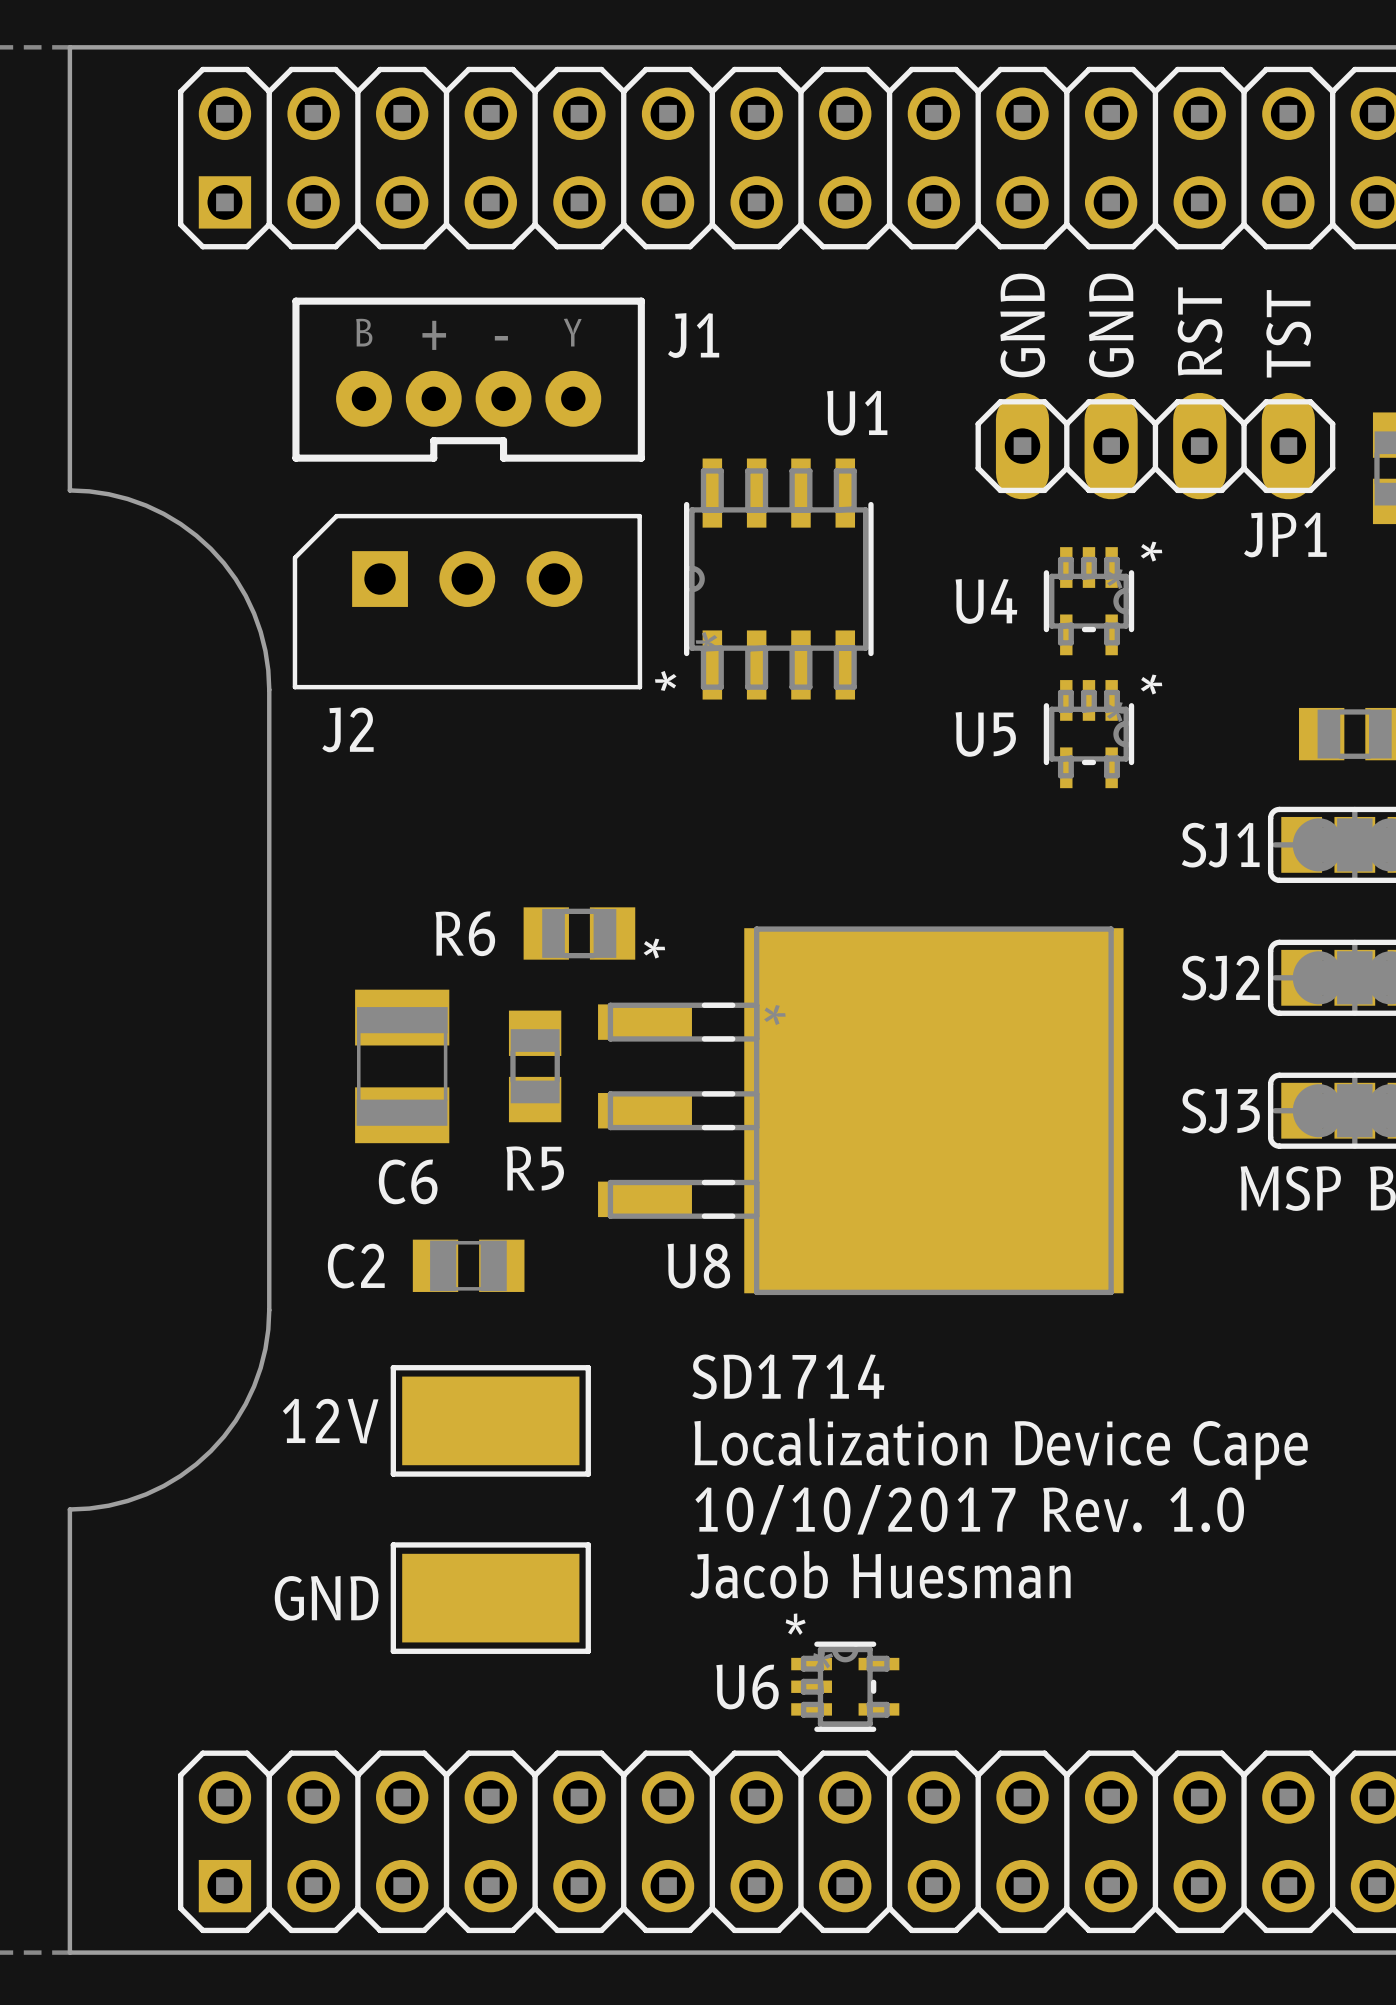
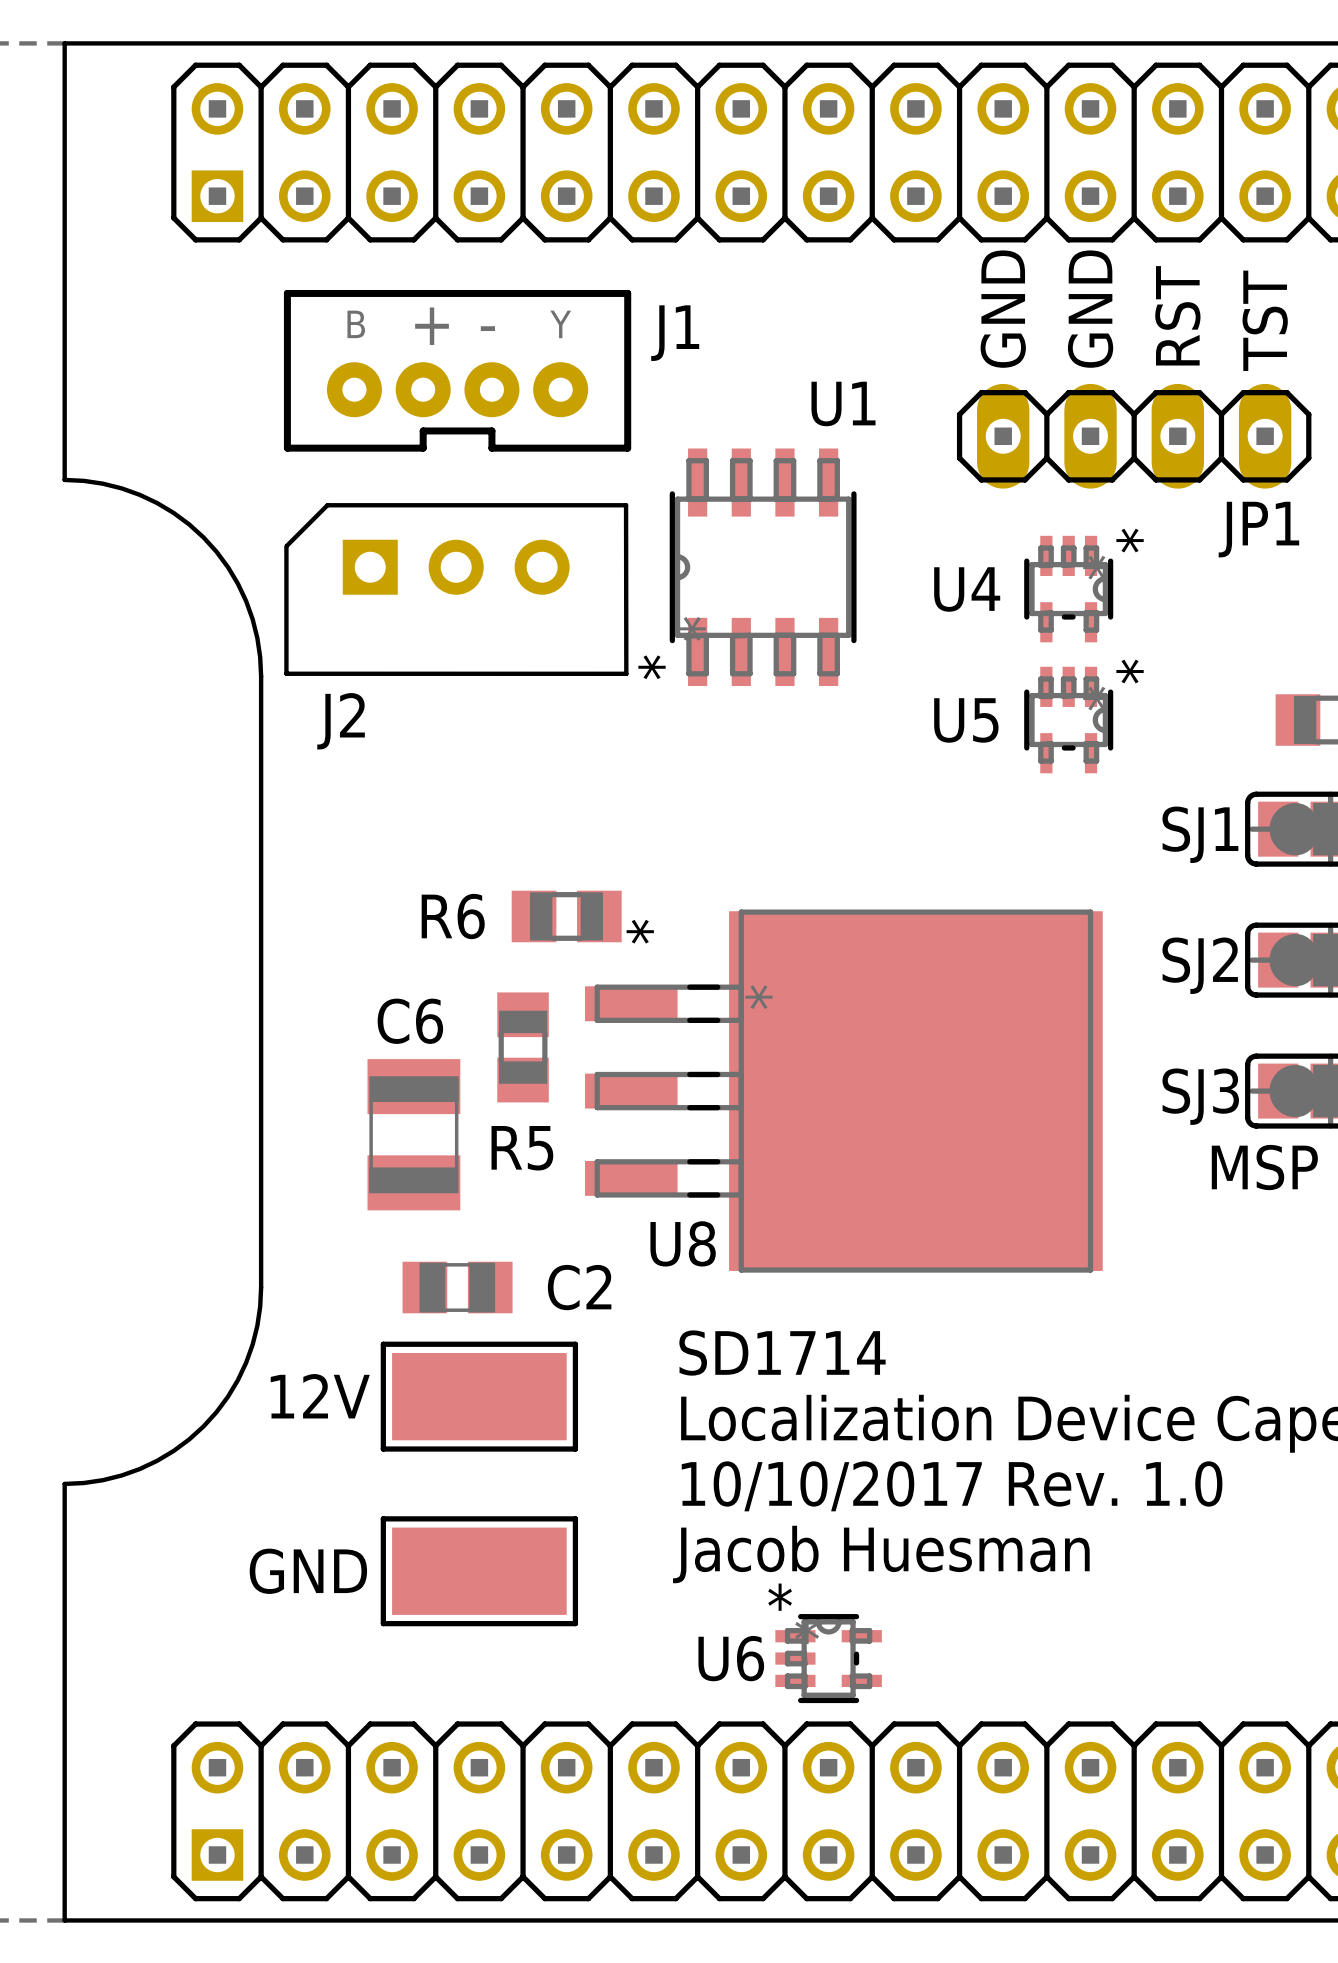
C6 position: (402, 1066) -> (413, 1134)
C6 name position: C6 (408, 1181) -> C6 (410, 1021)
C2 position: (468, 1265) -> (457, 1287)
C2 name position: C2 (356, 1266) -> C2 (579, 1287)

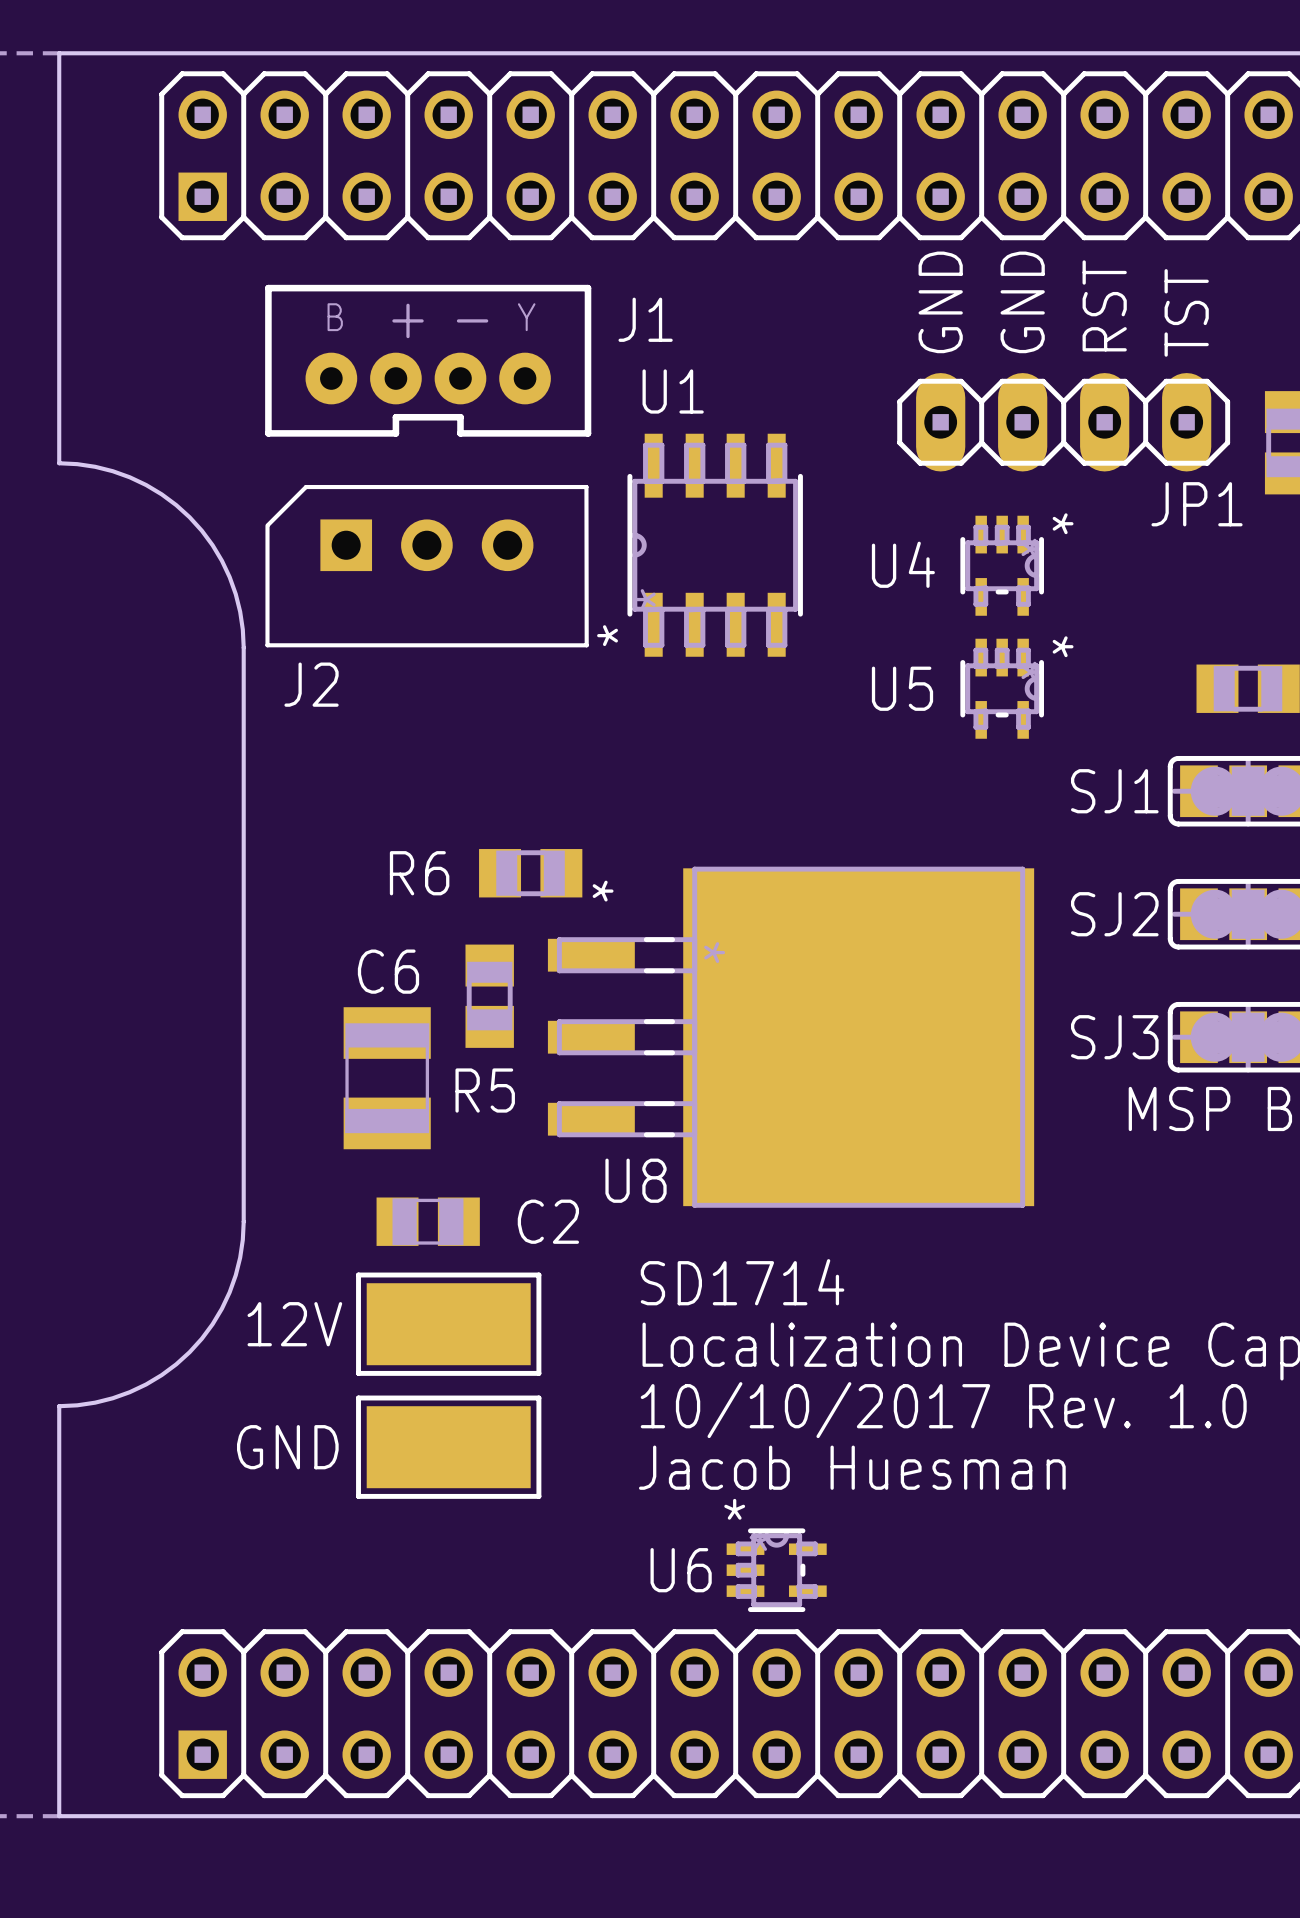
U1 name position: U1 (843, 403) -> U1 (673, 391)
text position: GND (308, 1571) -> GND (287, 1447)
part position: (479, 1571) -> (448, 1447)

